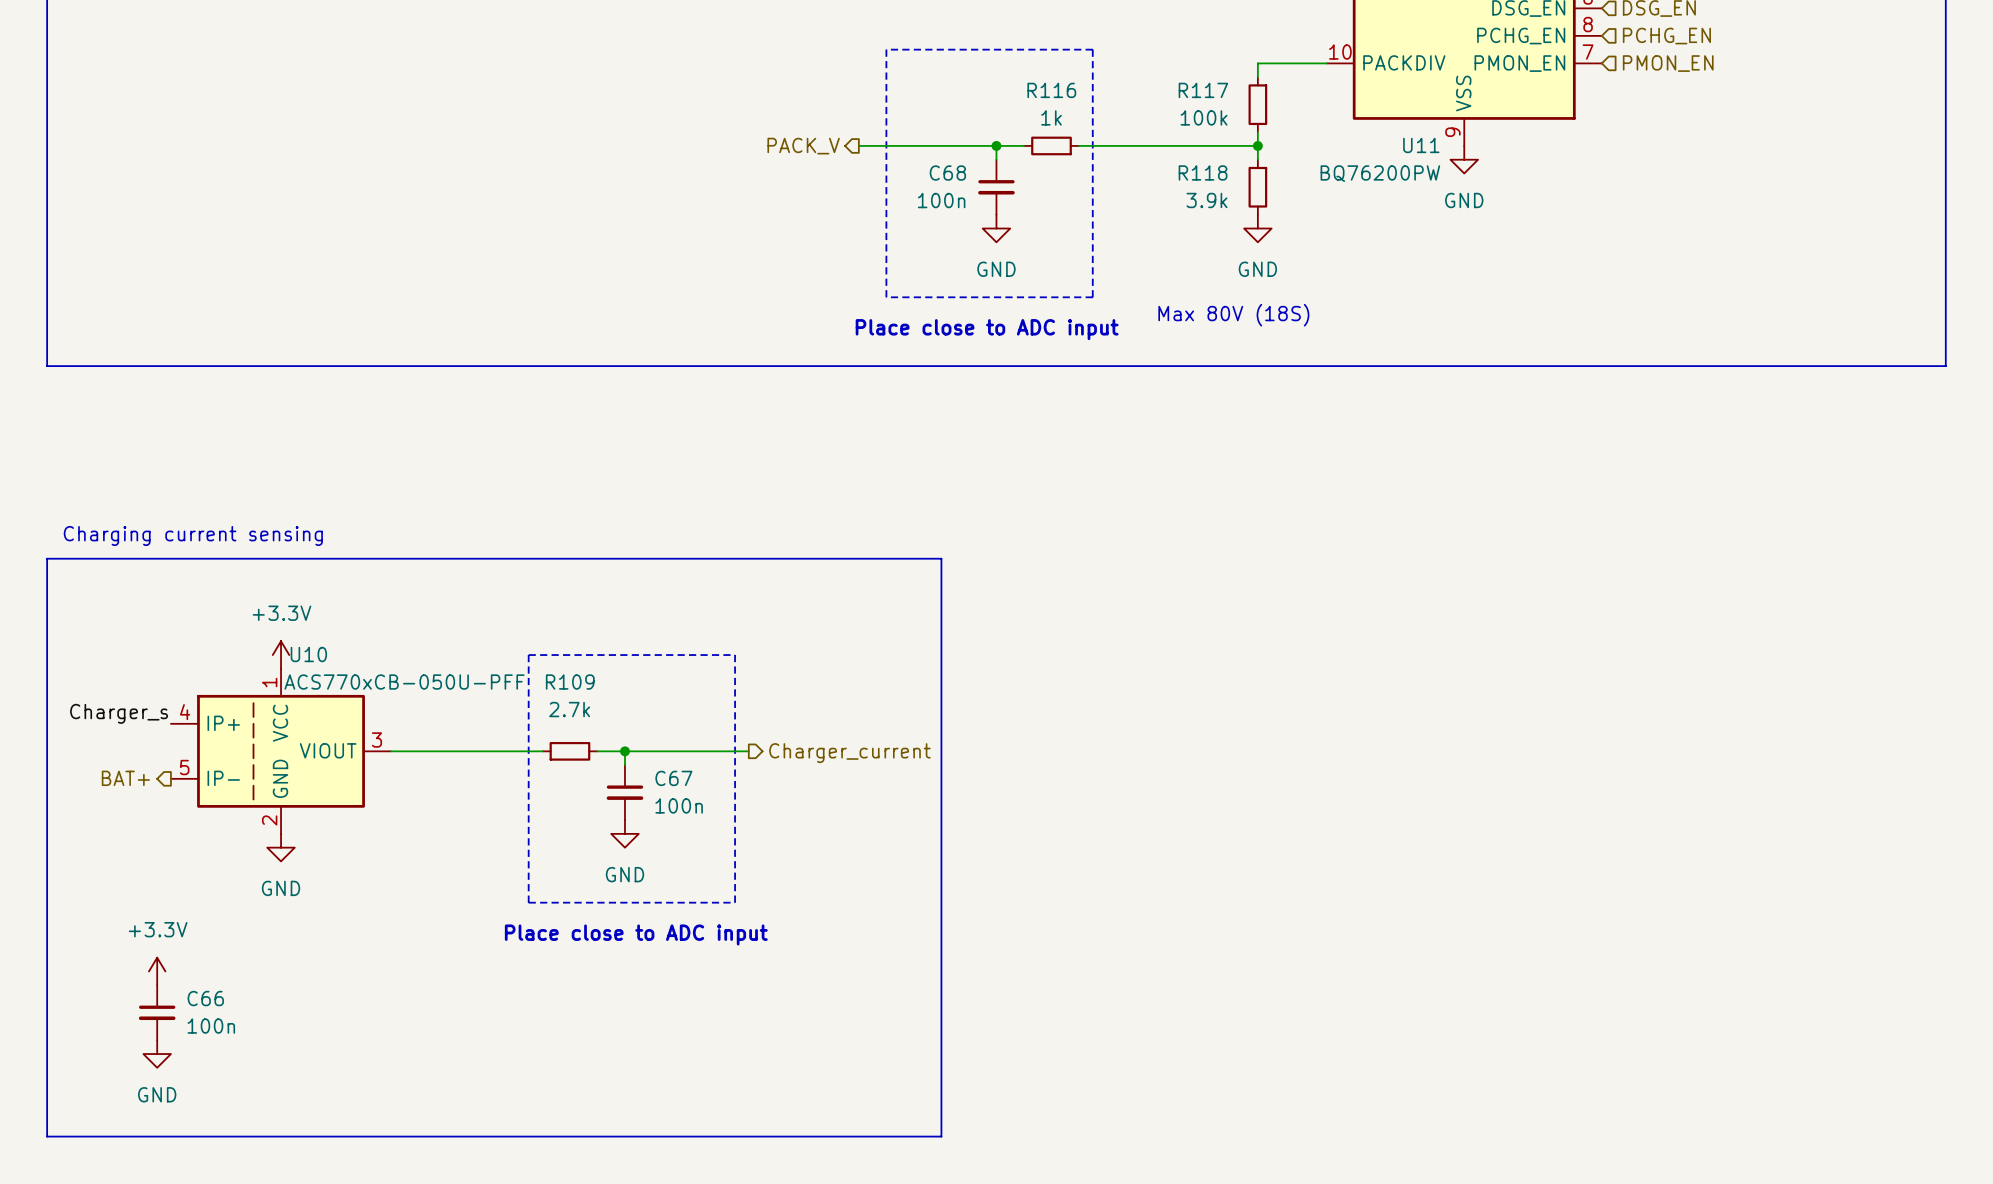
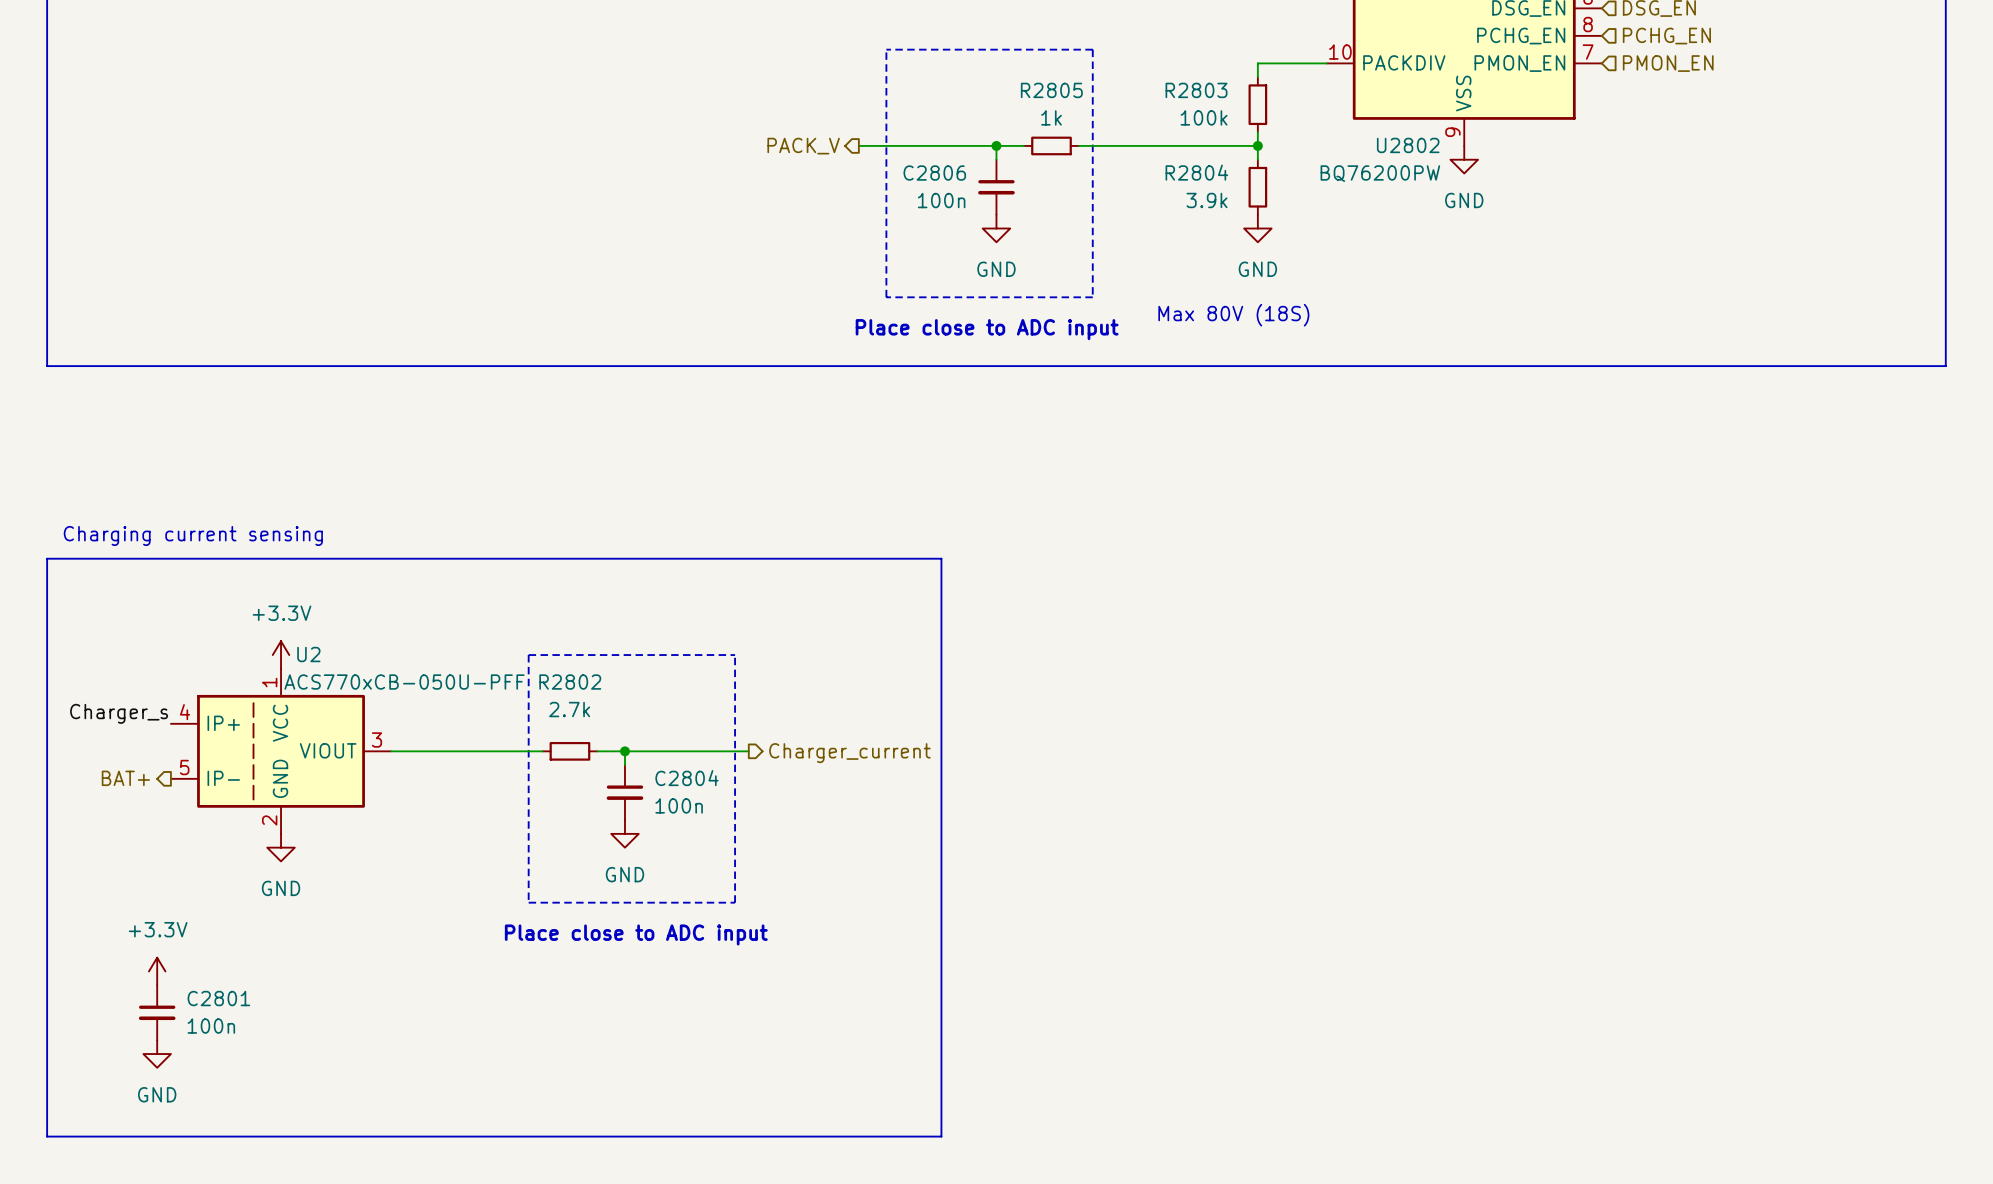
R116 name: R116 (1051, 90) -> R2805 (1051, 90)
R117 name: R117 (1203, 90) -> R2803 (1196, 90)
U11 name: U11 (1421, 145) -> U2802 (1408, 145)
R118 name: R118 (1203, 172) -> R2804 (1196, 172)
C68 name: C68 (947, 173) -> C2806 (934, 173)
U10 name: U10 (308, 654) -> U2 (308, 654)
R109 name: R109 (570, 682) -> R2802 (570, 682)
C67 name: C67 (673, 778) -> C2804 (687, 778)
C66 name: C66 (205, 998) -> C2801 (218, 998)

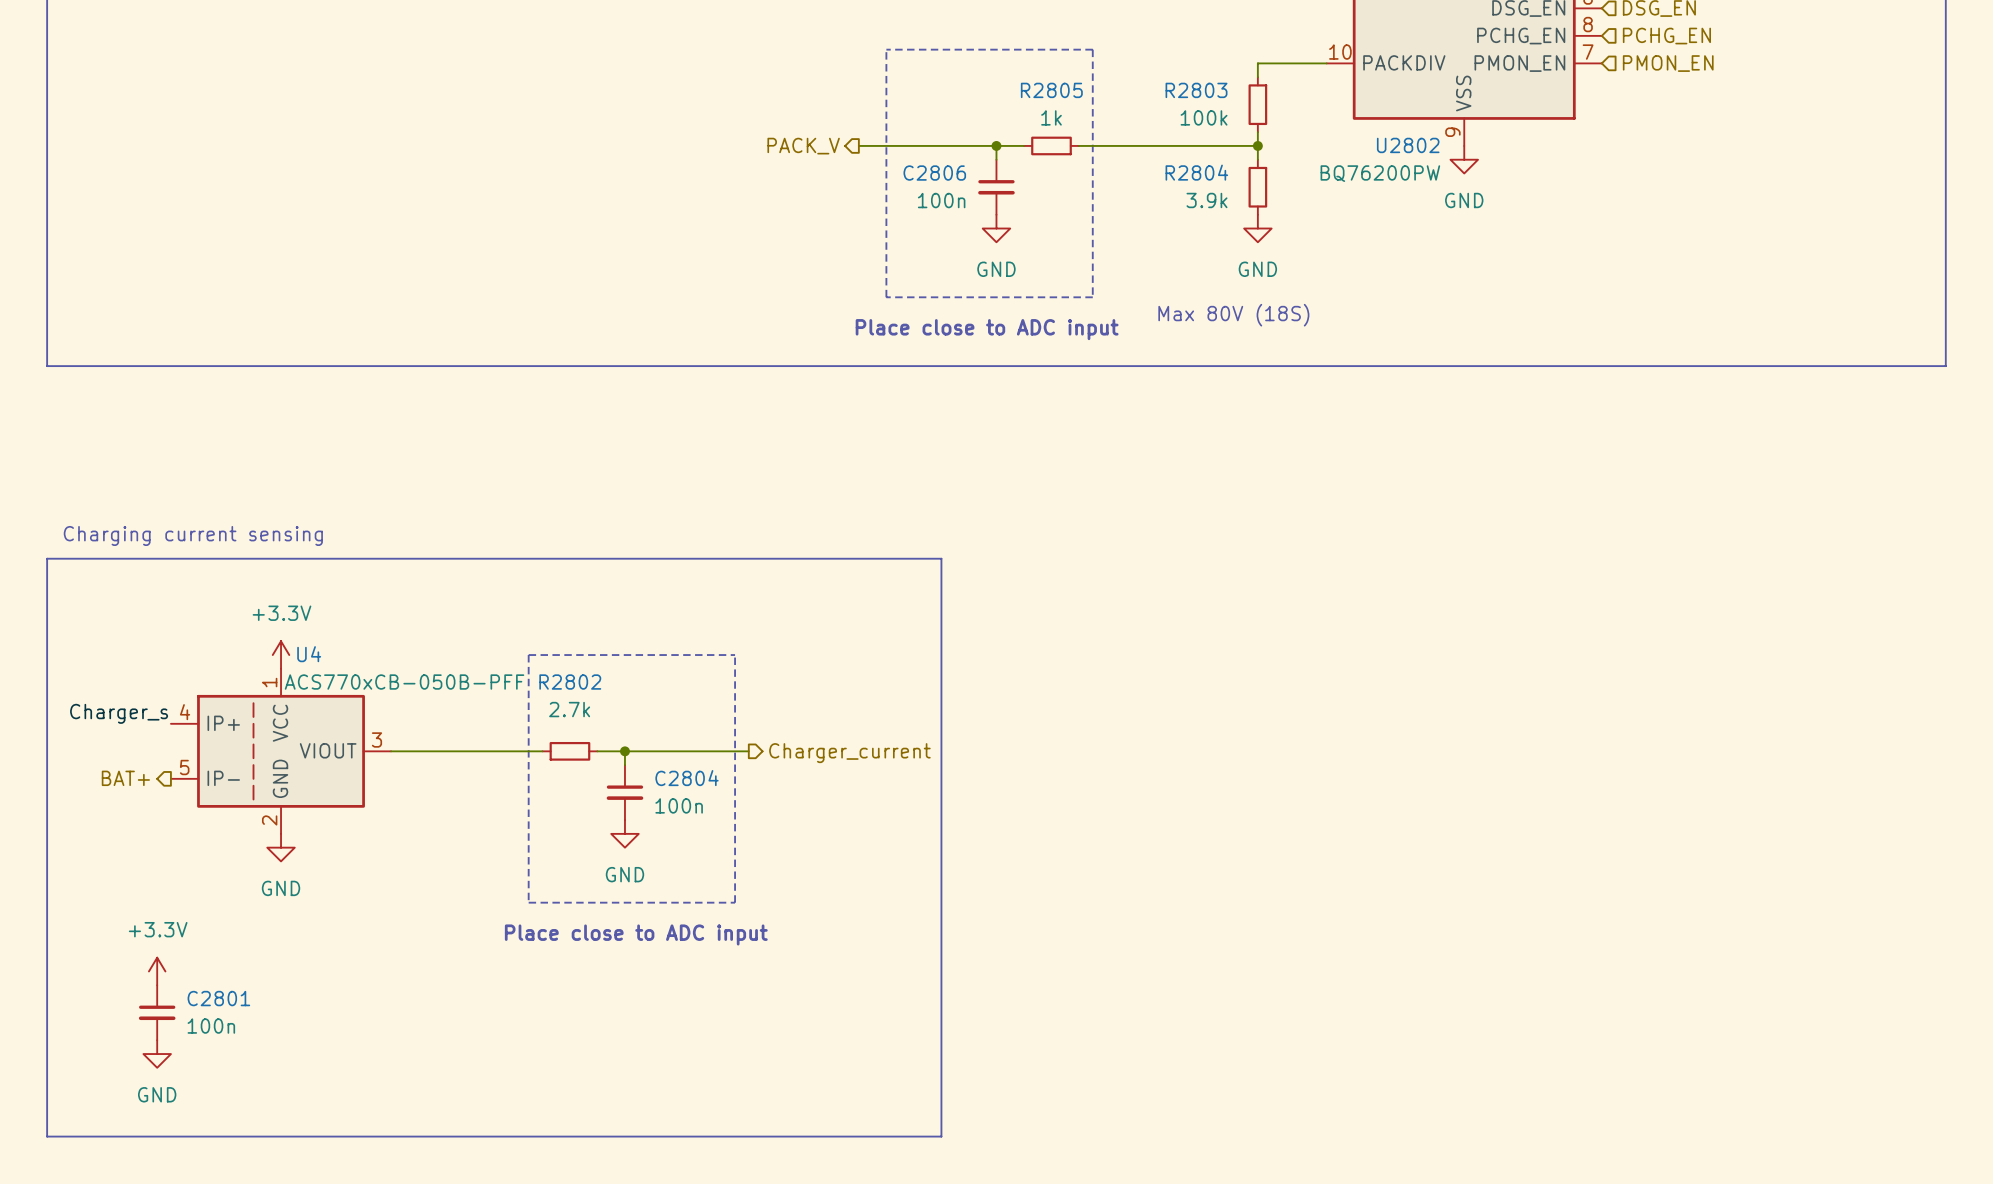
U2 name: U2 (308, 654) -> U4 (309, 654)
U2 value: ACS770xCB-050U-PFF (404, 682) -> ACS770xCB-050B-PFF (404, 682)

